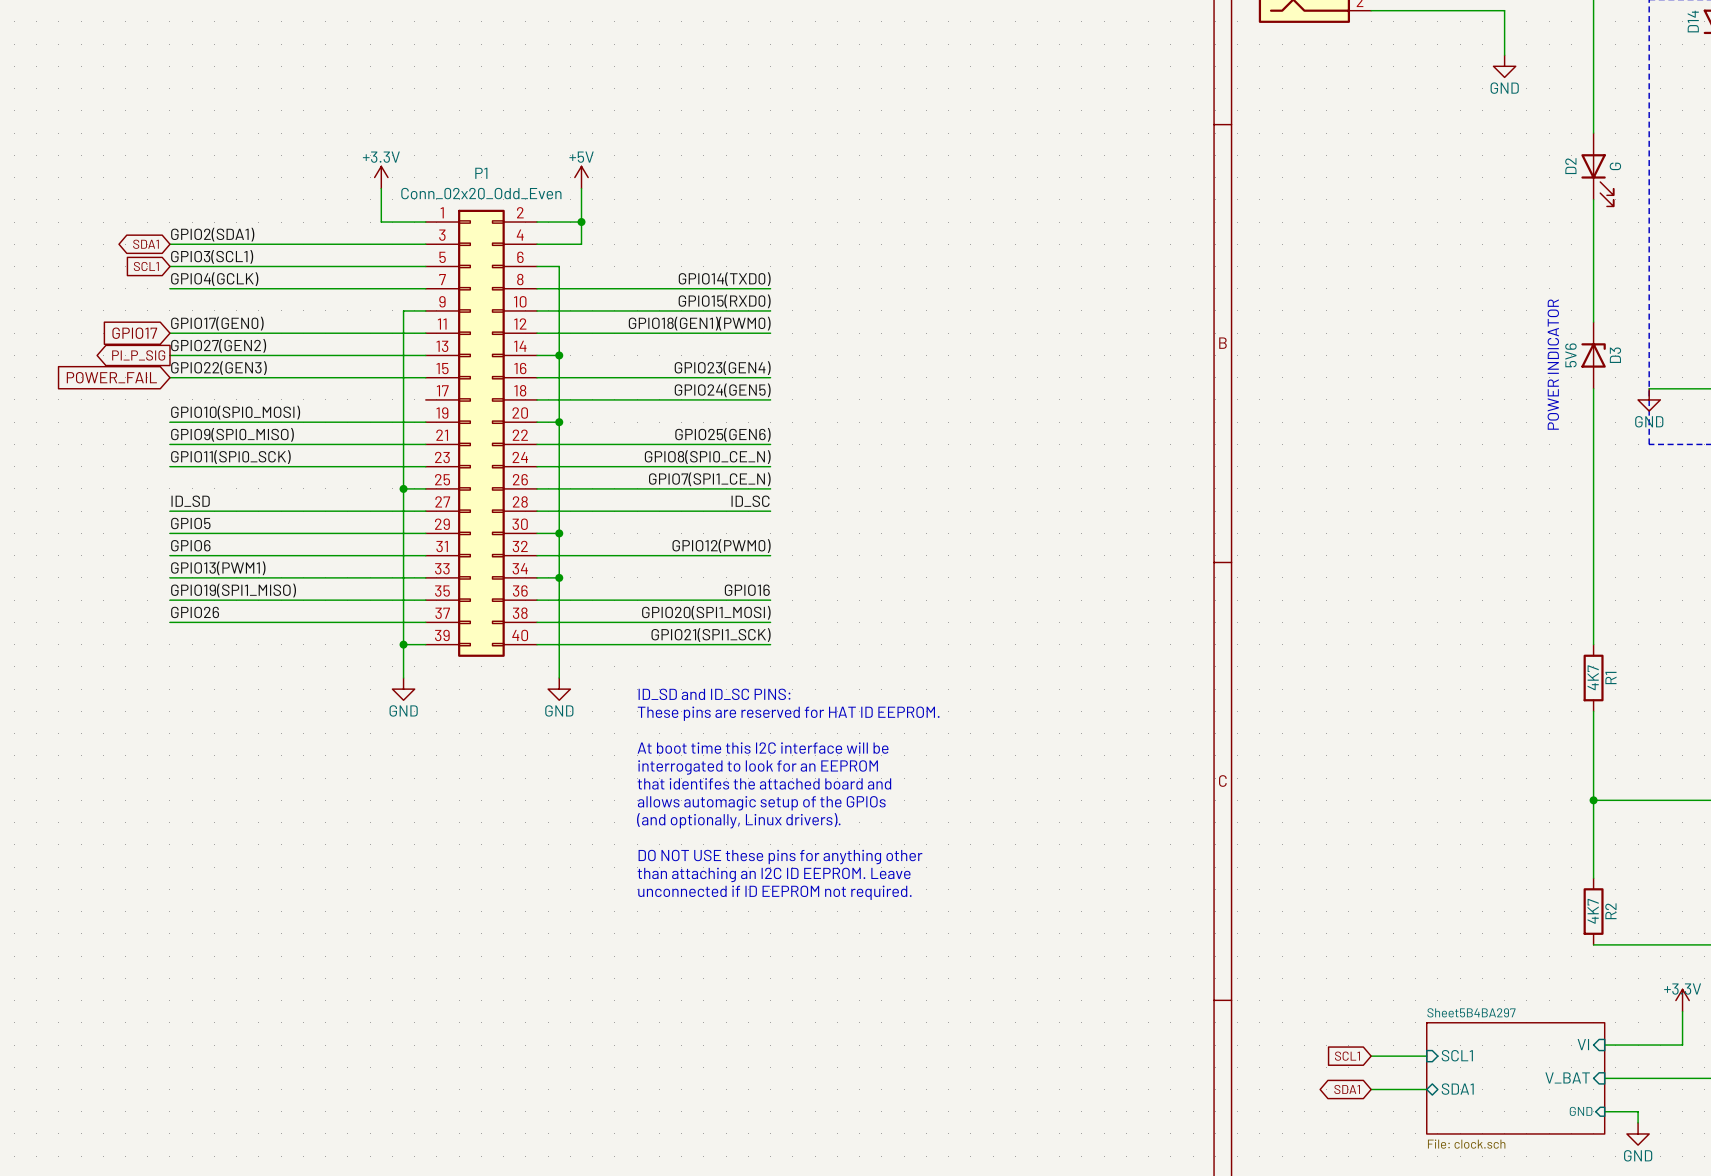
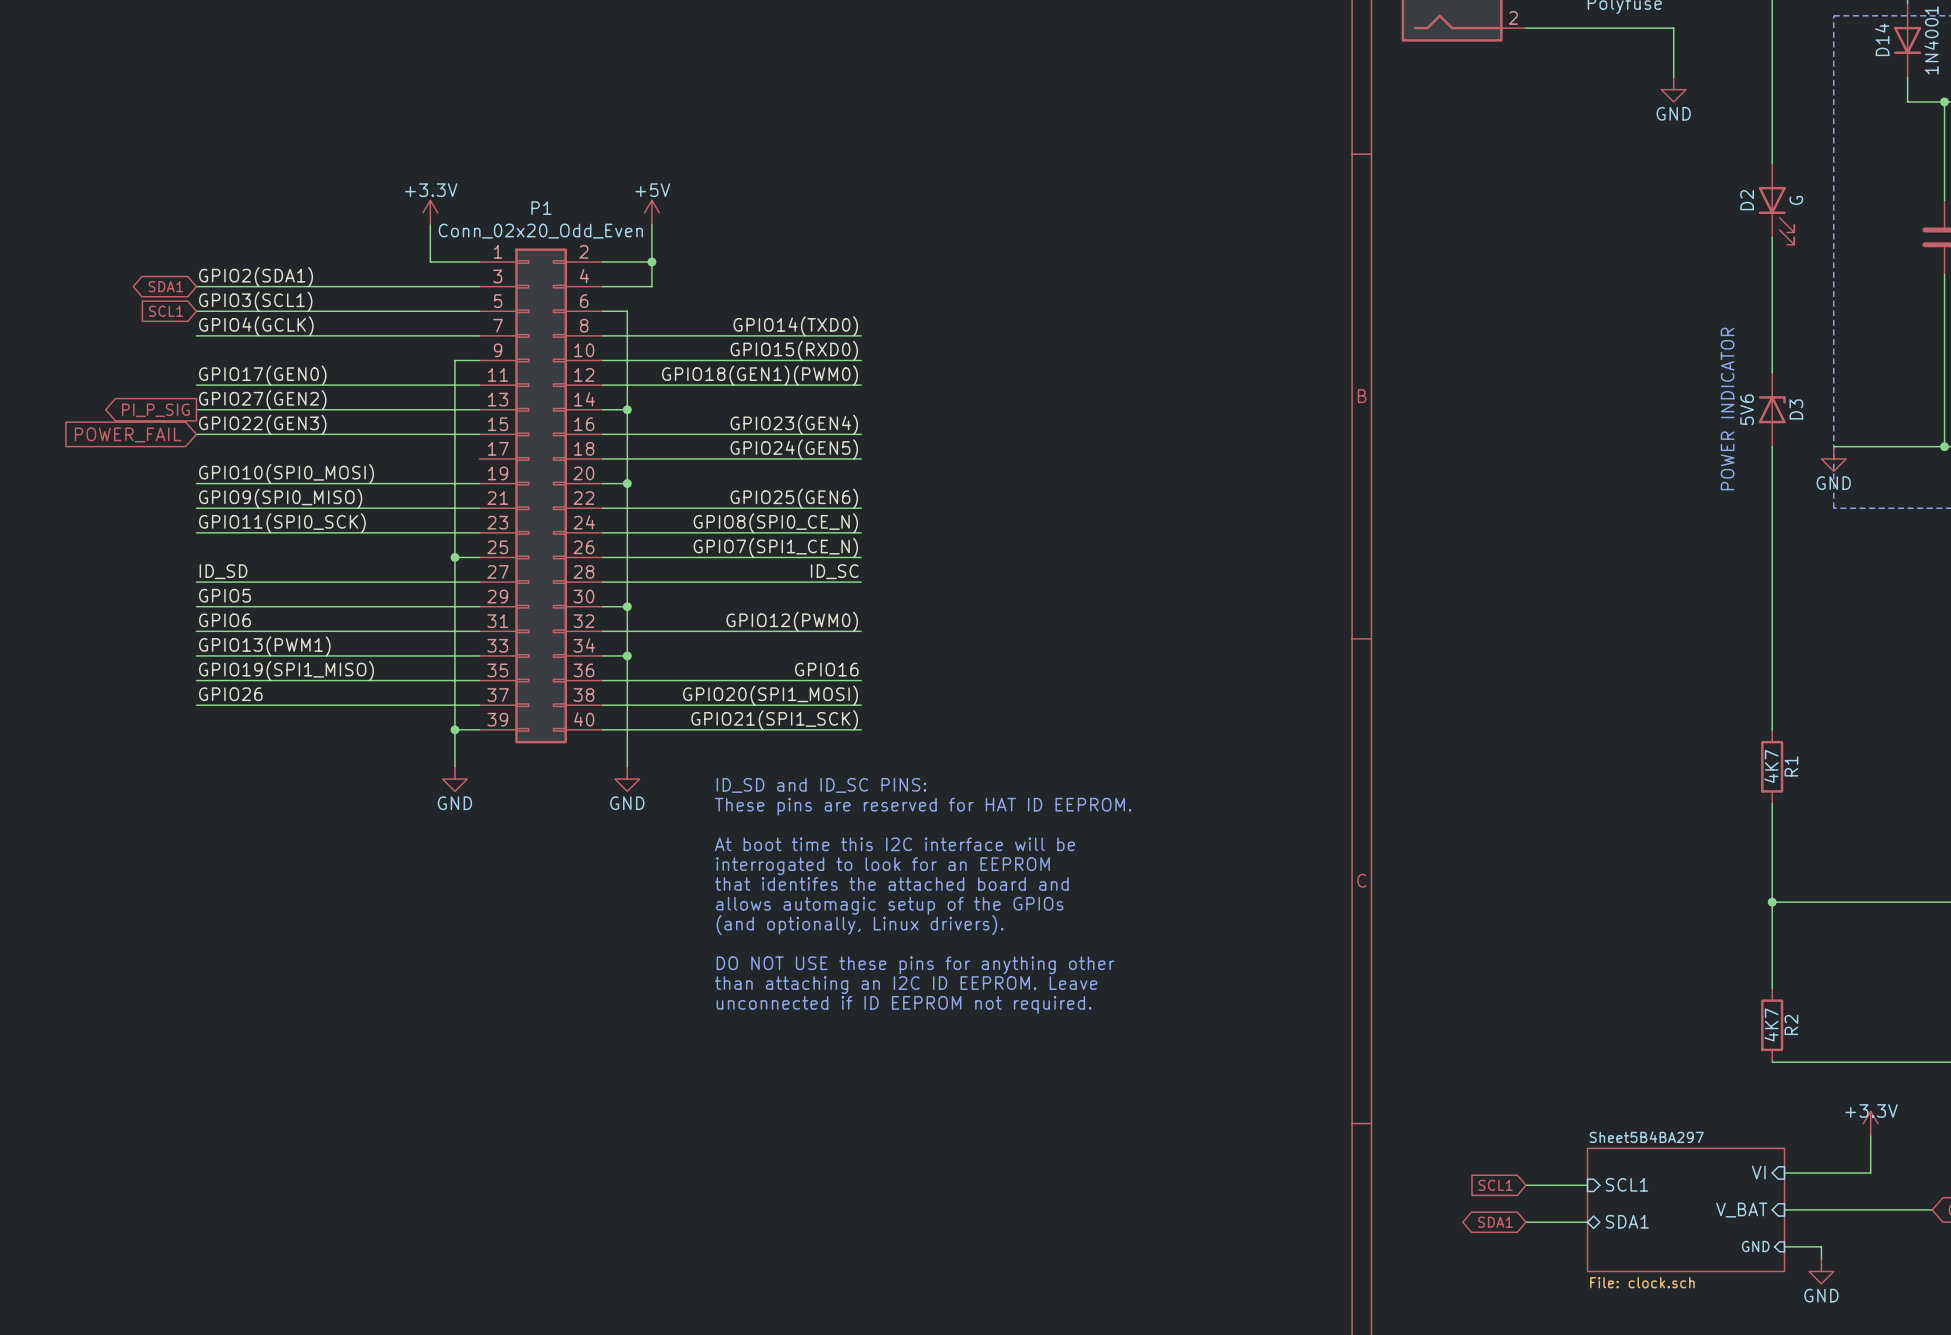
global label: GPIO17 (134, 333) -> none

